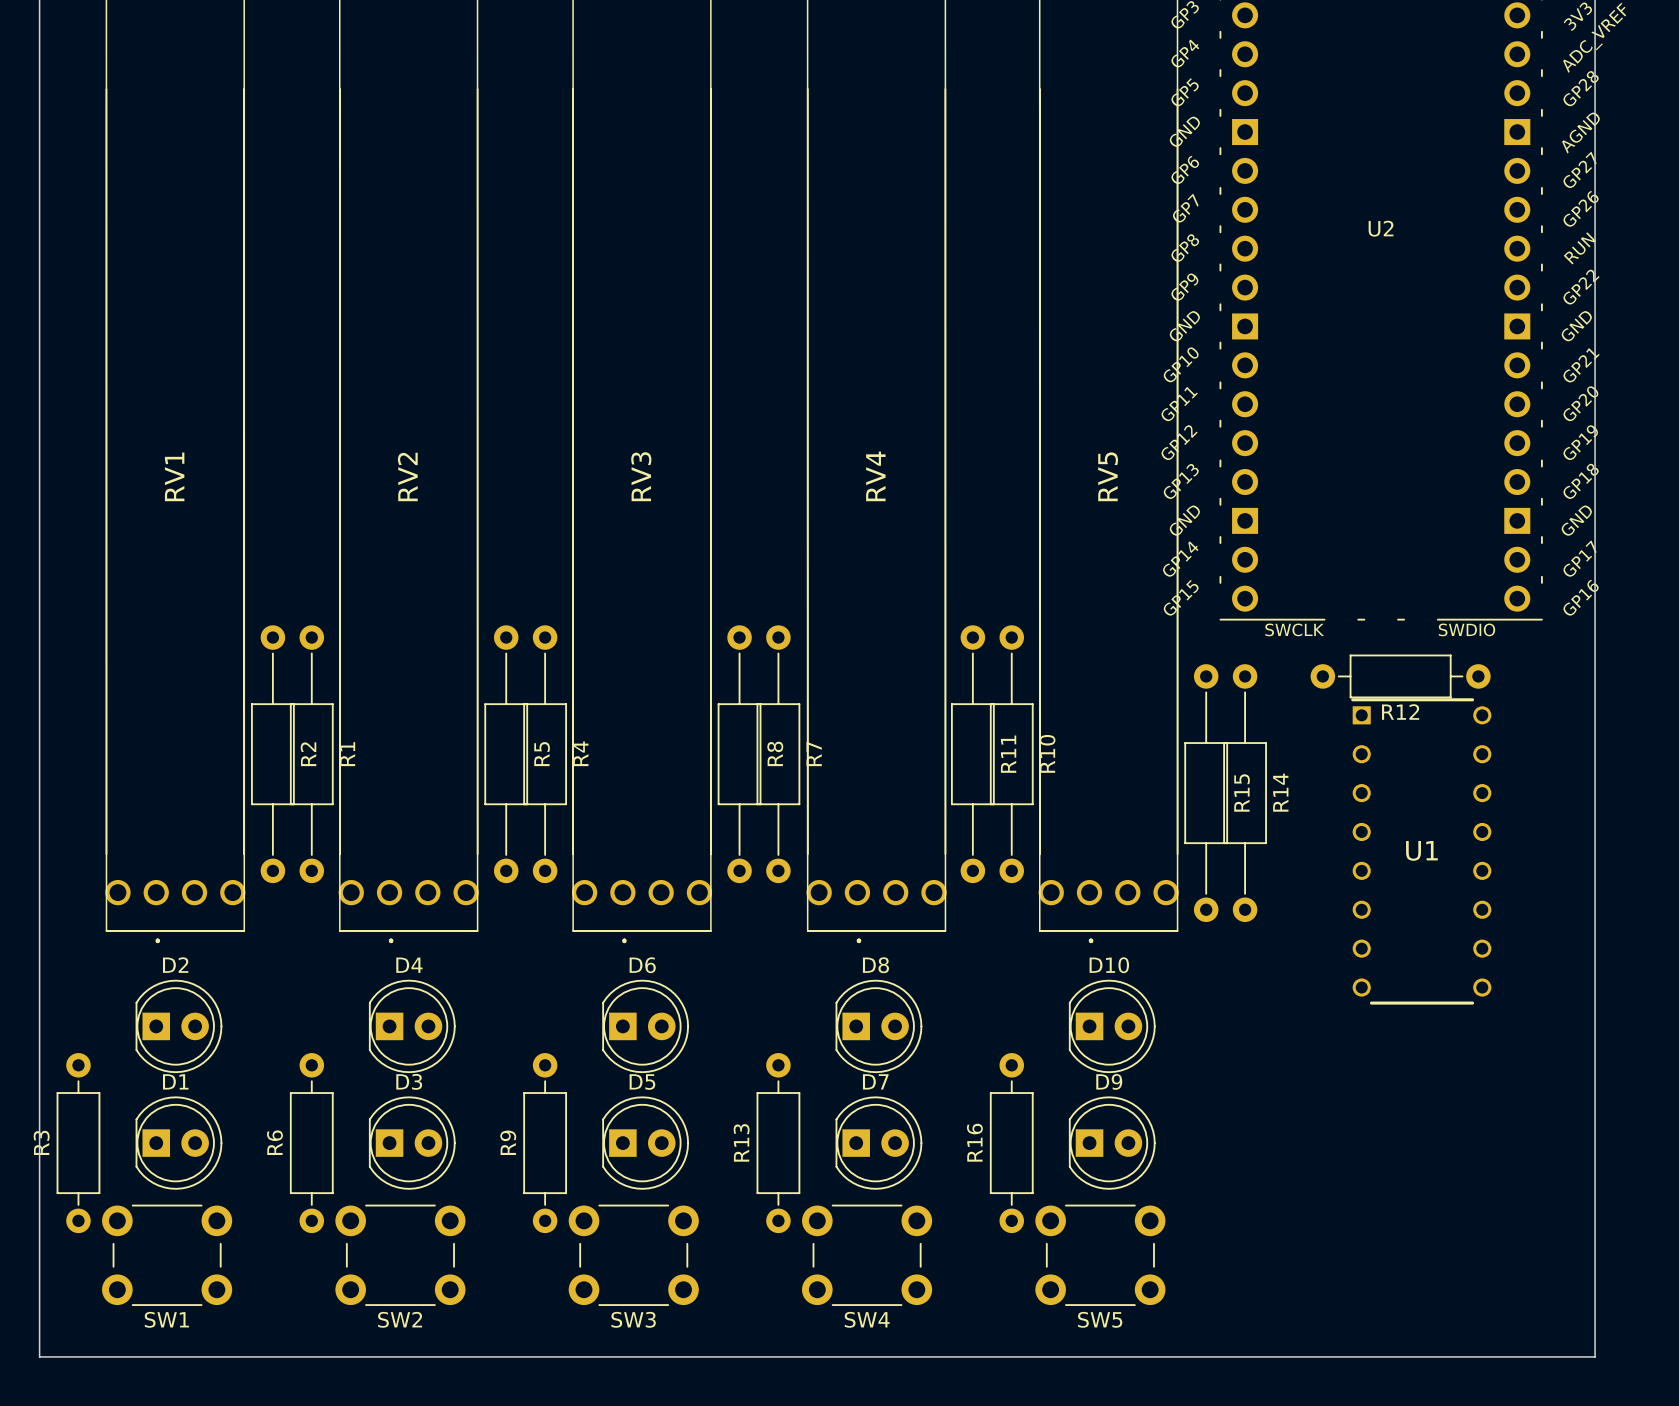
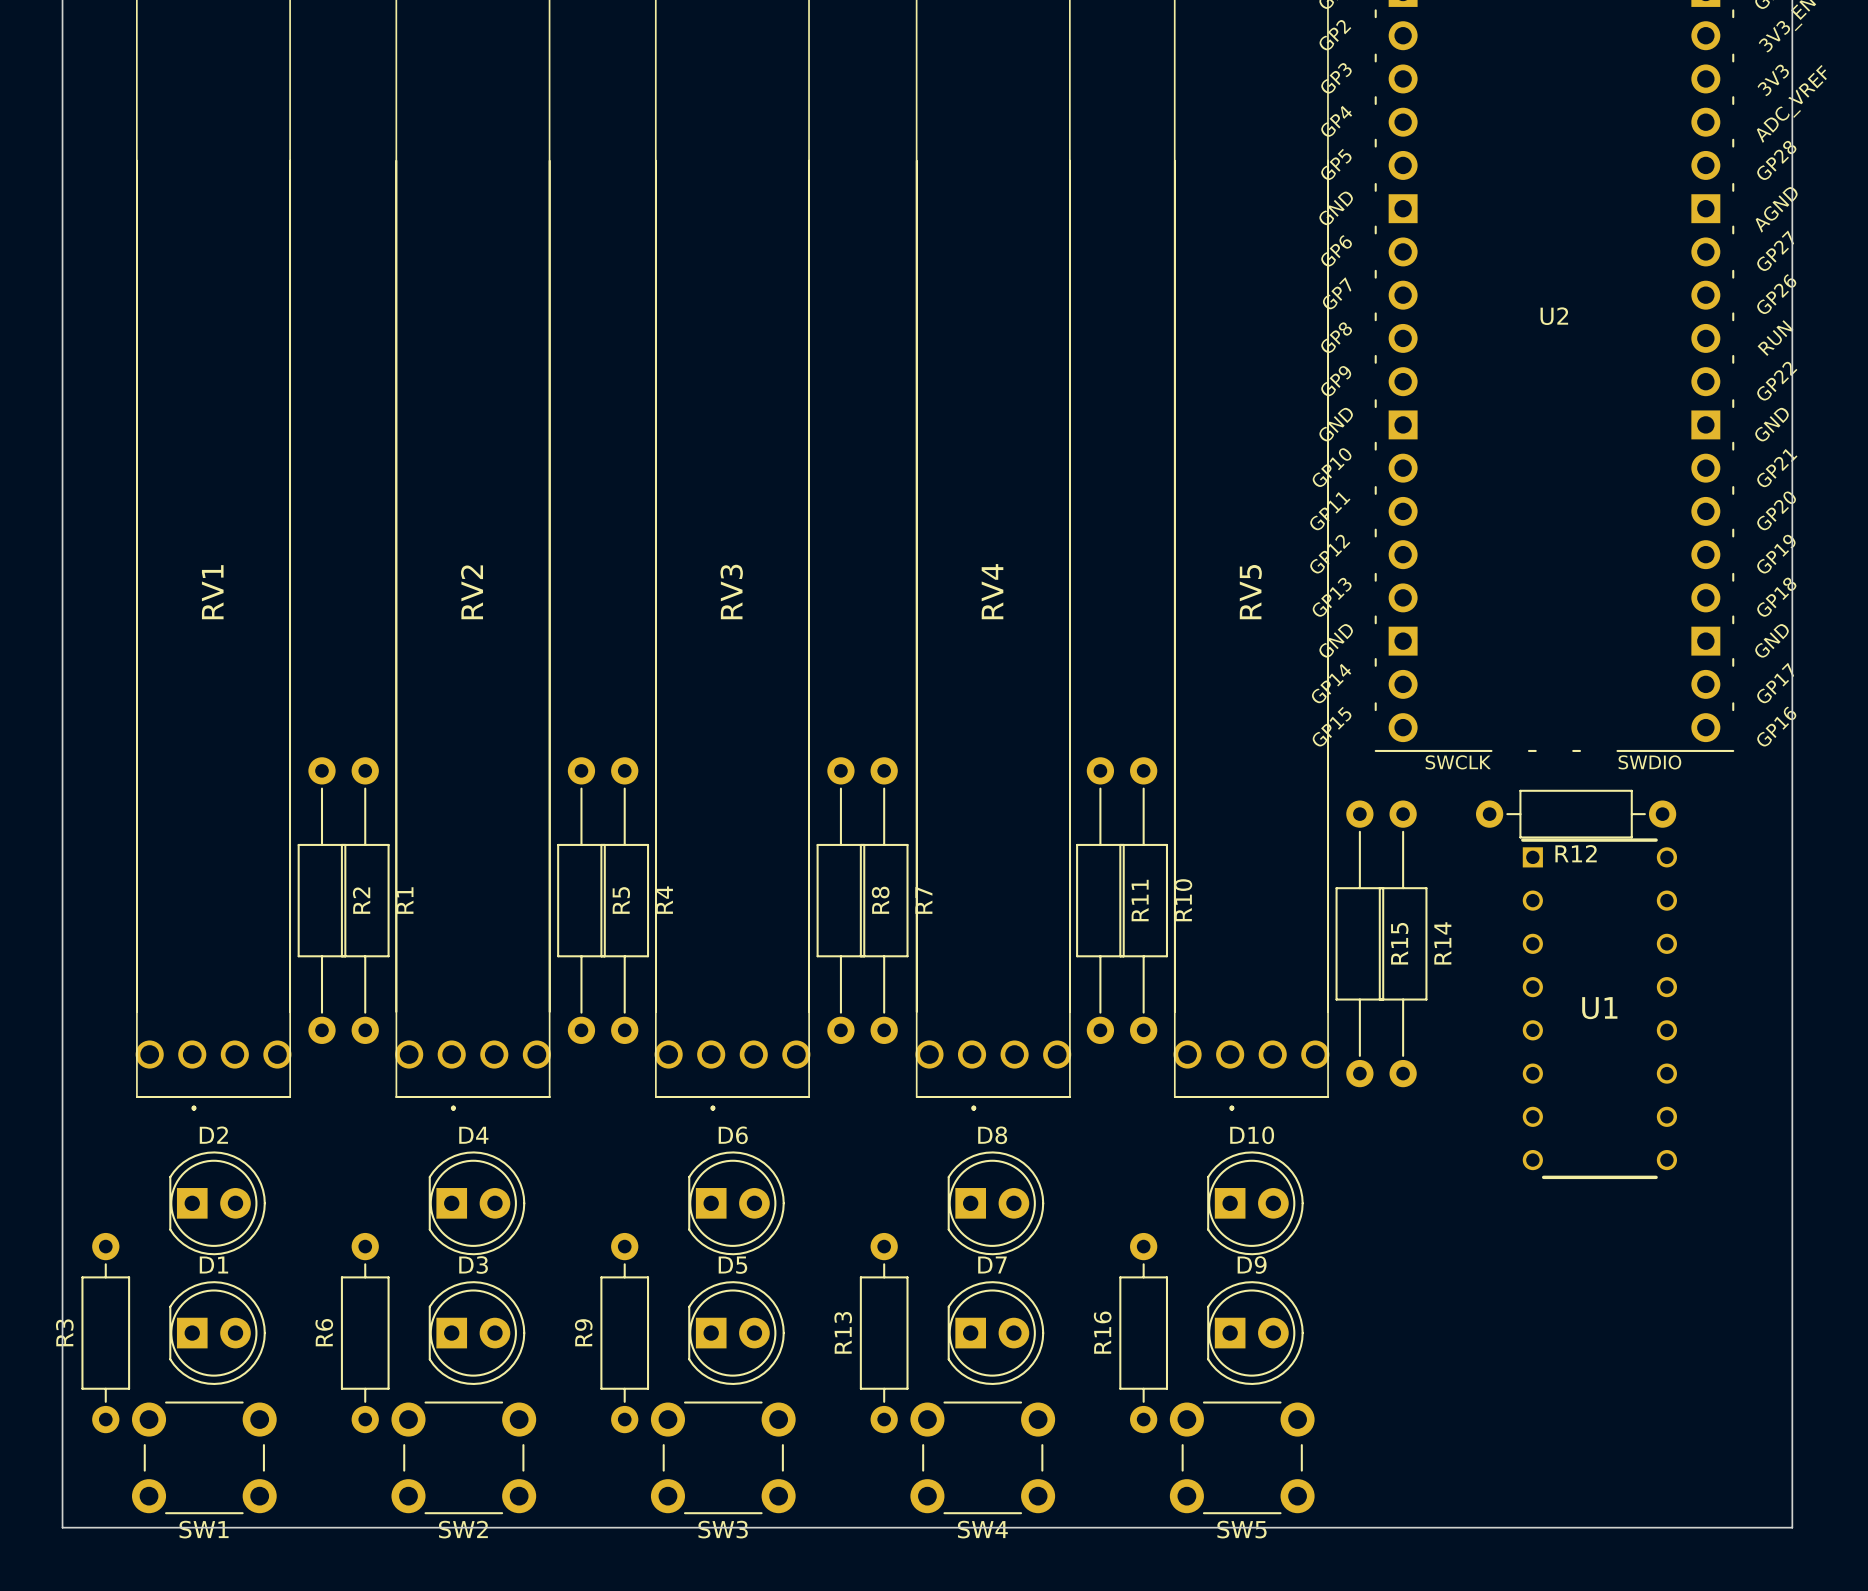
board edge: (39, 1318) (39, 1356) (1595, 1356) (1595, 1318) -> (62, 1527) (1792, 1527)

